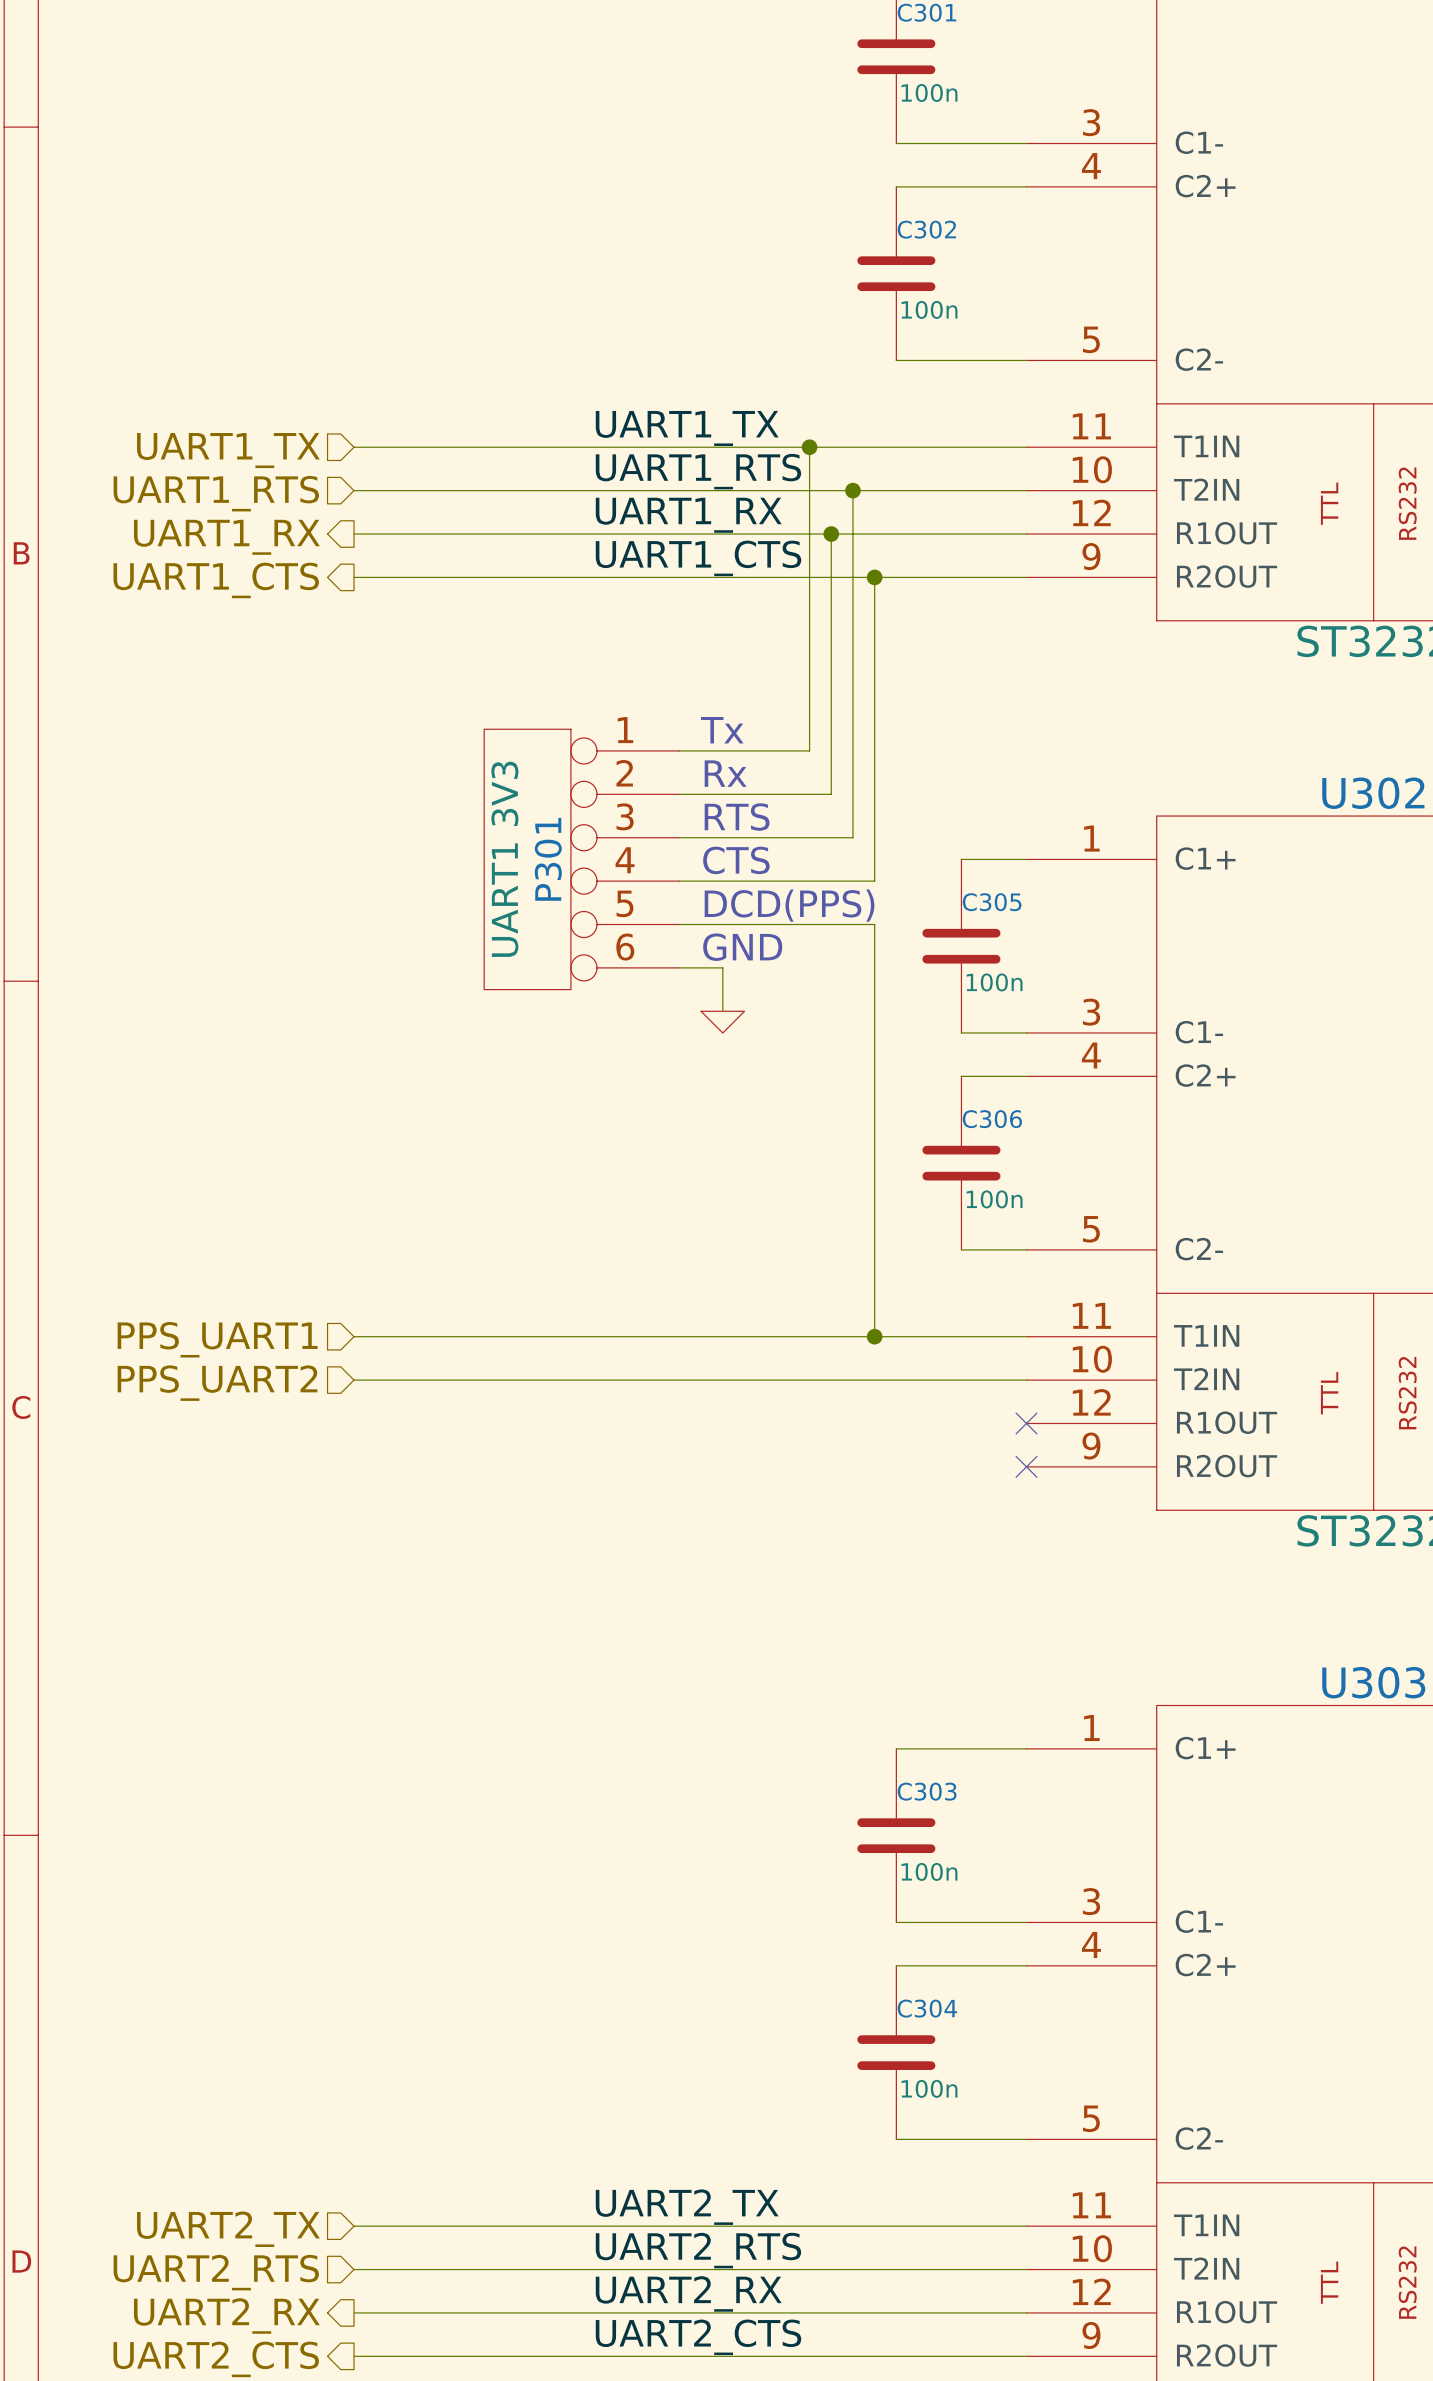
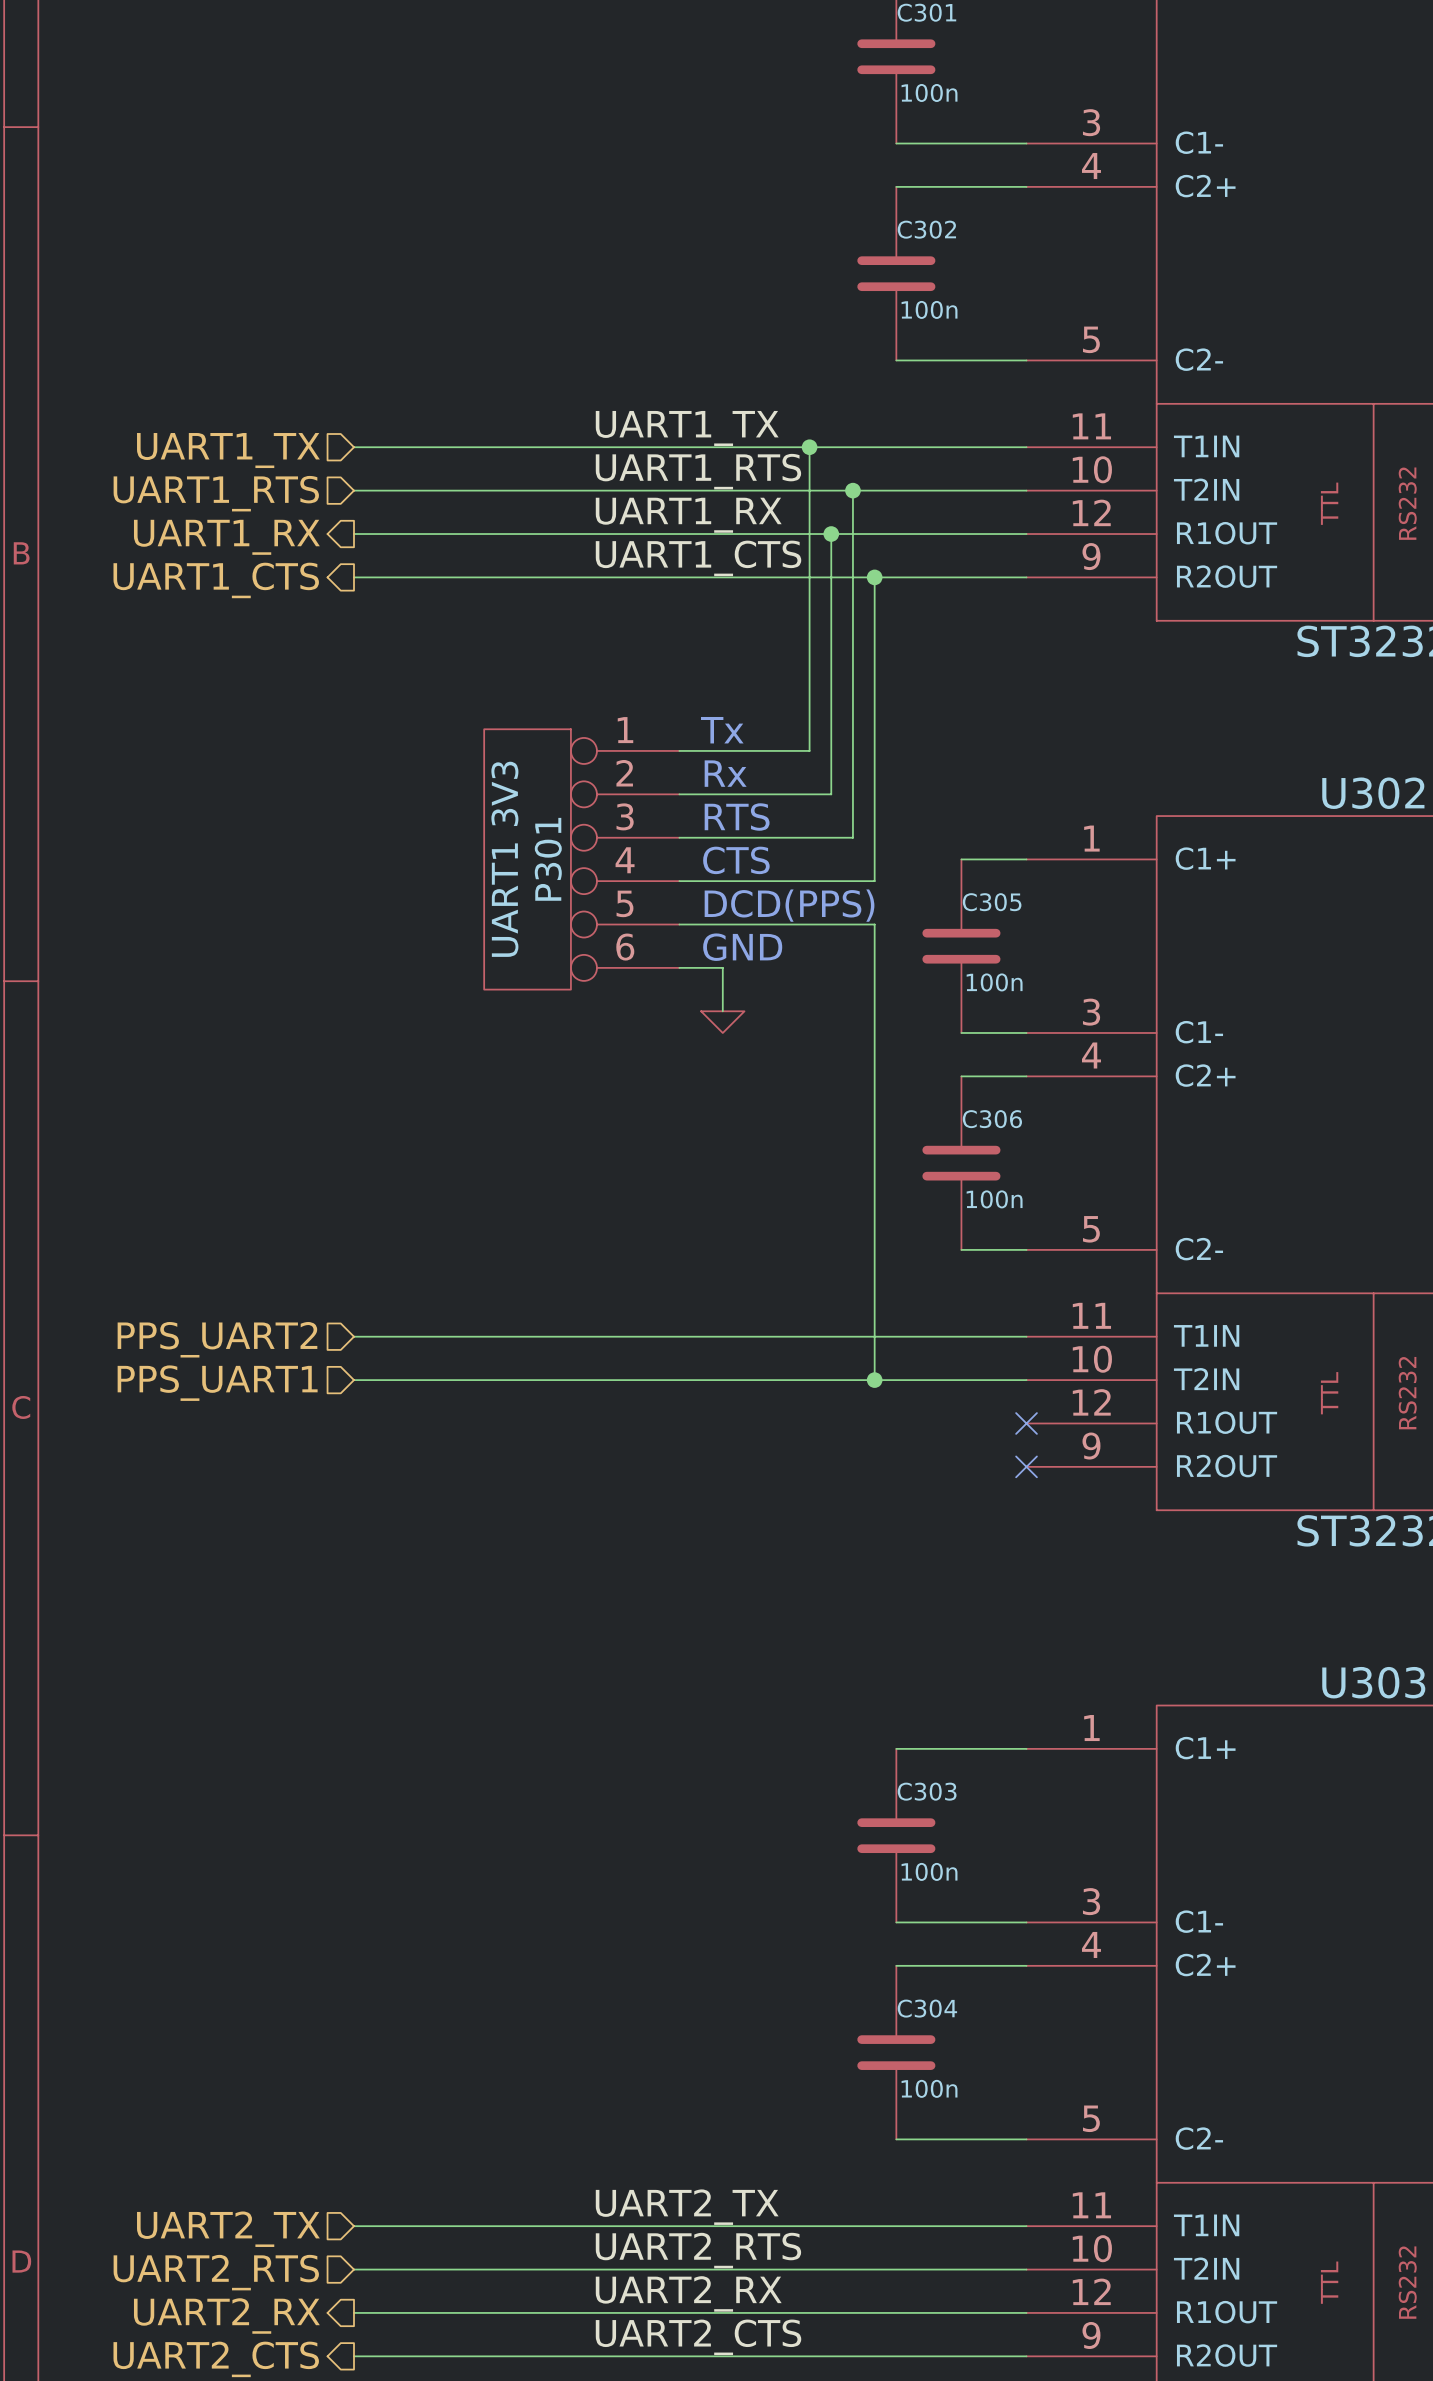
wire: none -> (874, 1336) (874, 1380)
junction position: (874, 1336) -> (874, 1380)
hierarchical label: PPS_UART1 (217, 1339) -> PPS_UART2 (217, 1339)
hierarchical label: PPS_UART2 (217, 1383) -> PPS_UART1 (217, 1383)

